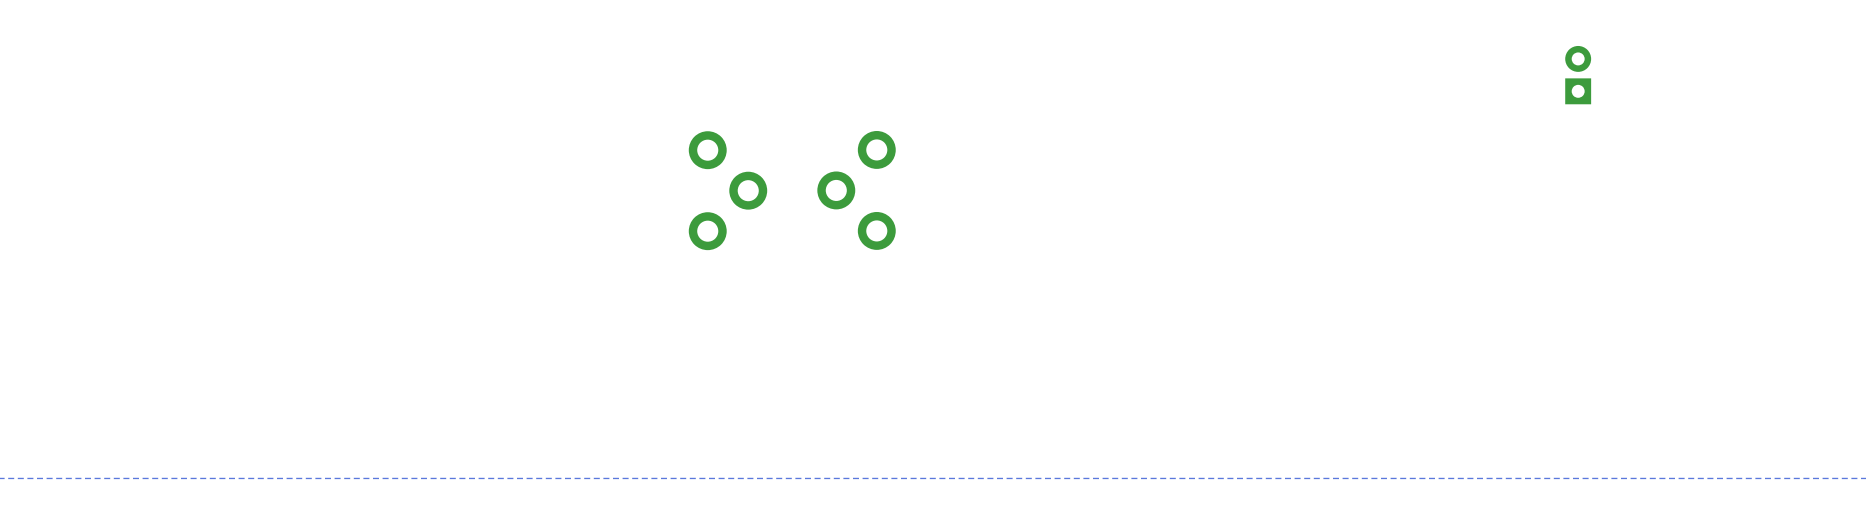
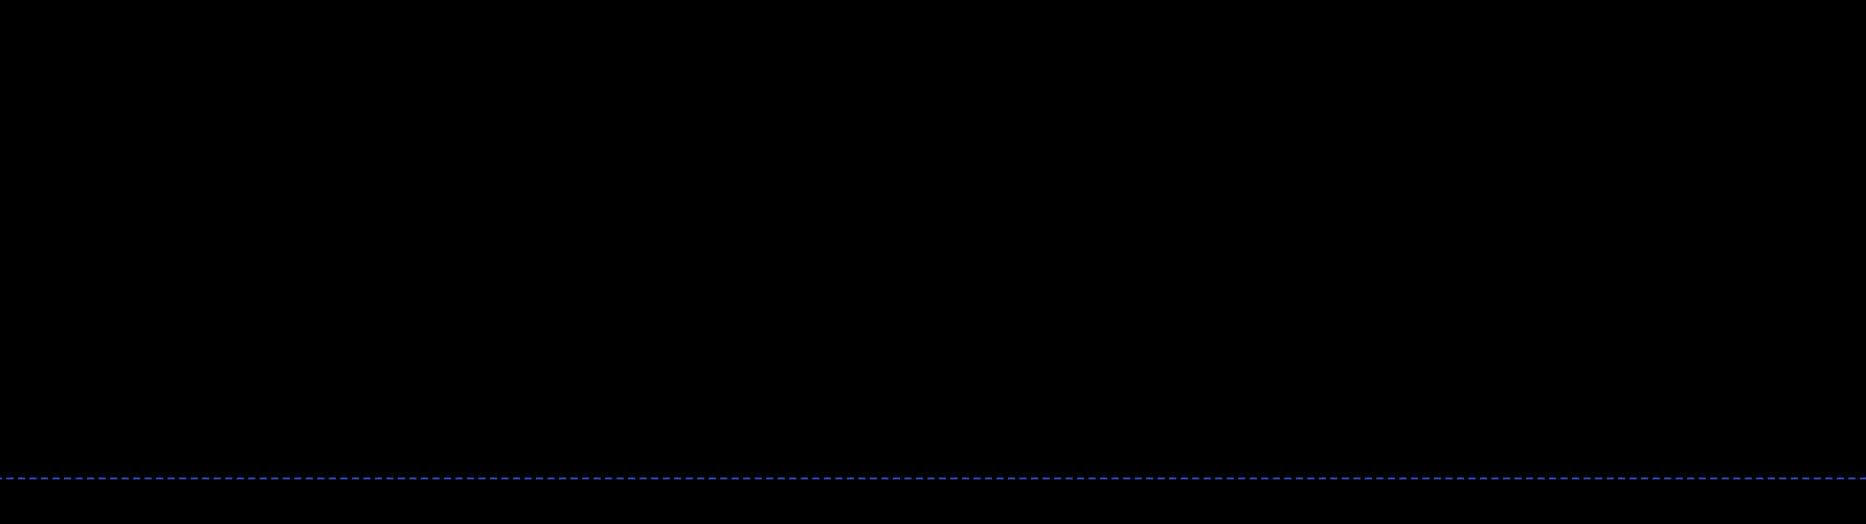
part: (1578, 75) -> none
part: (727, 190) -> none
part: (856, 190) -> none

